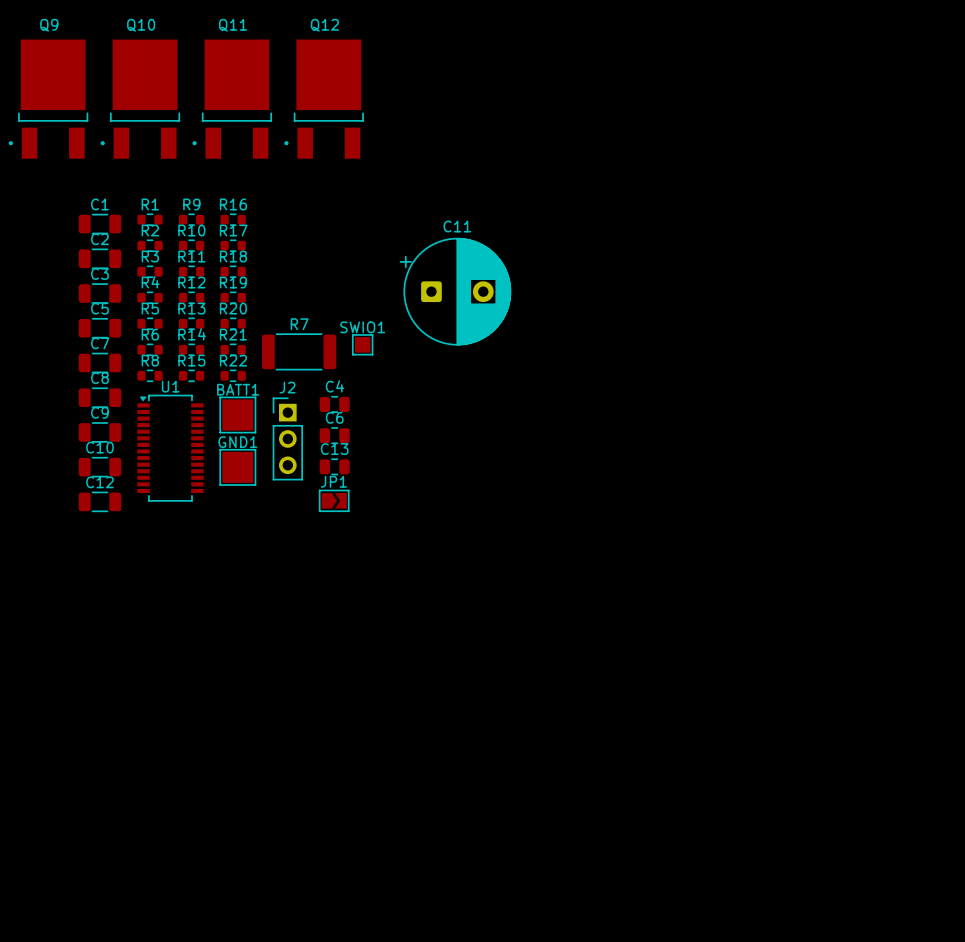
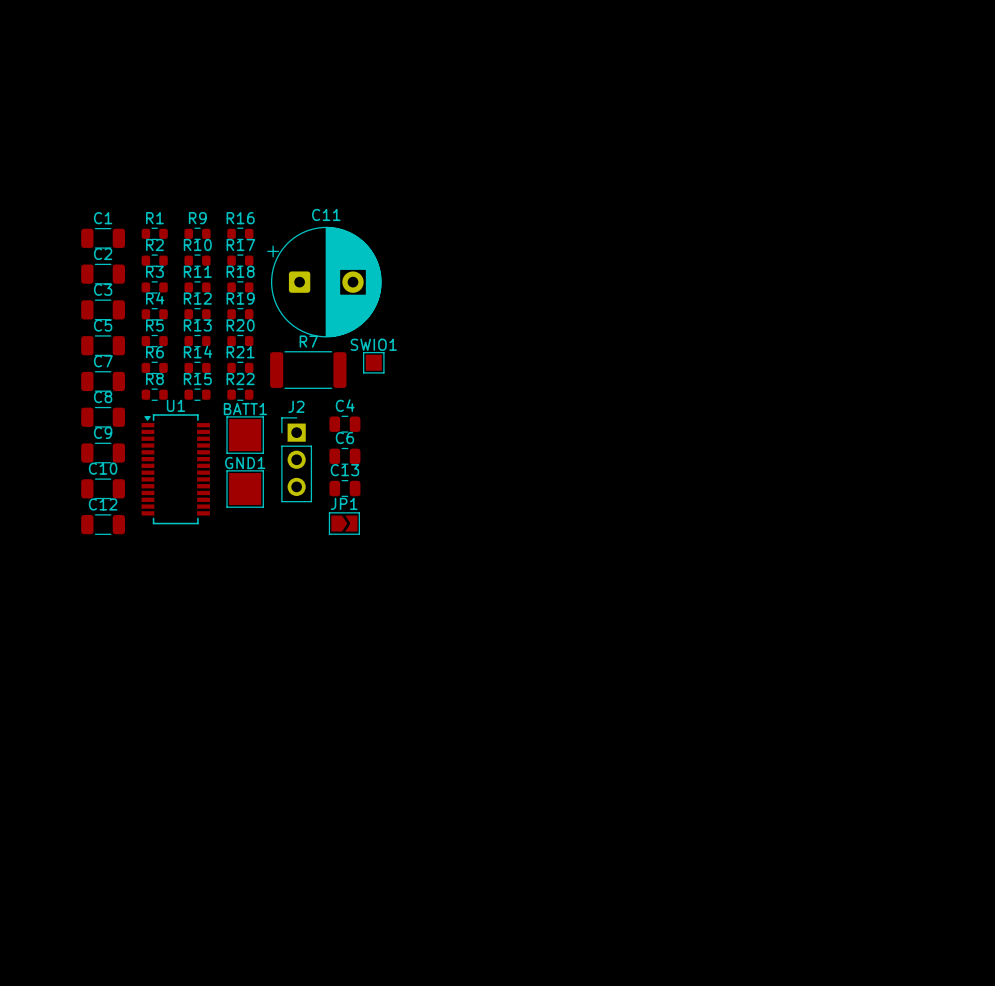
Q9: (48, 99) -> none
Q10: (140, 99) -> none
Q11: (232, 99) -> none
Q12: (324, 99) -> none
C11 position: (455, 291) -> (324, 282)

